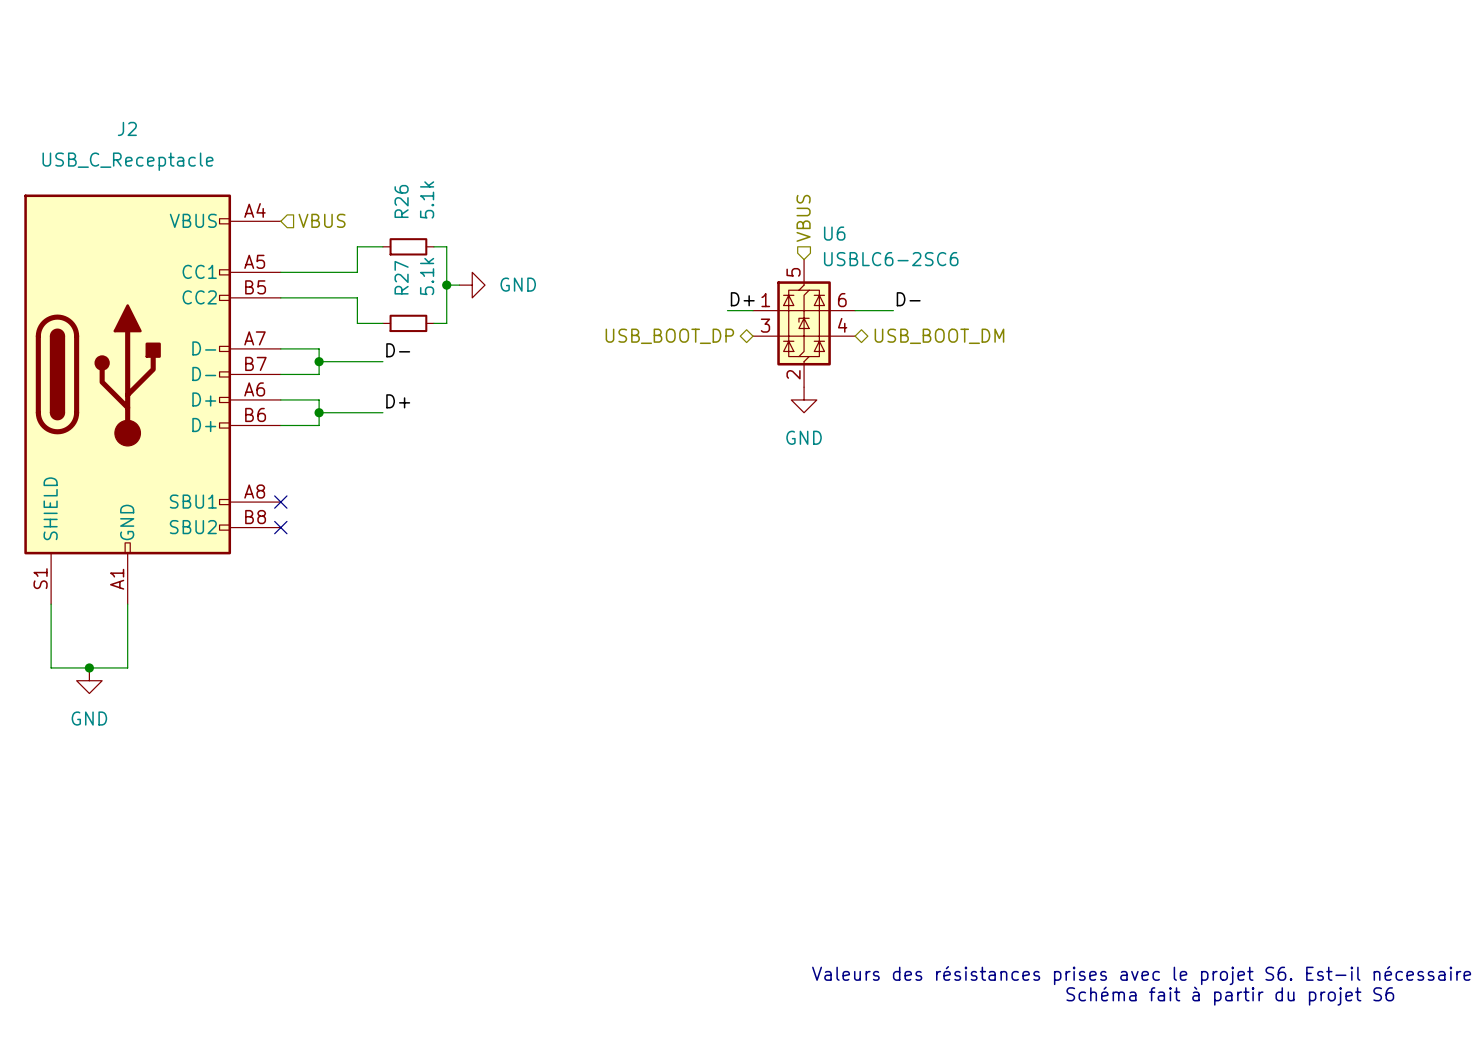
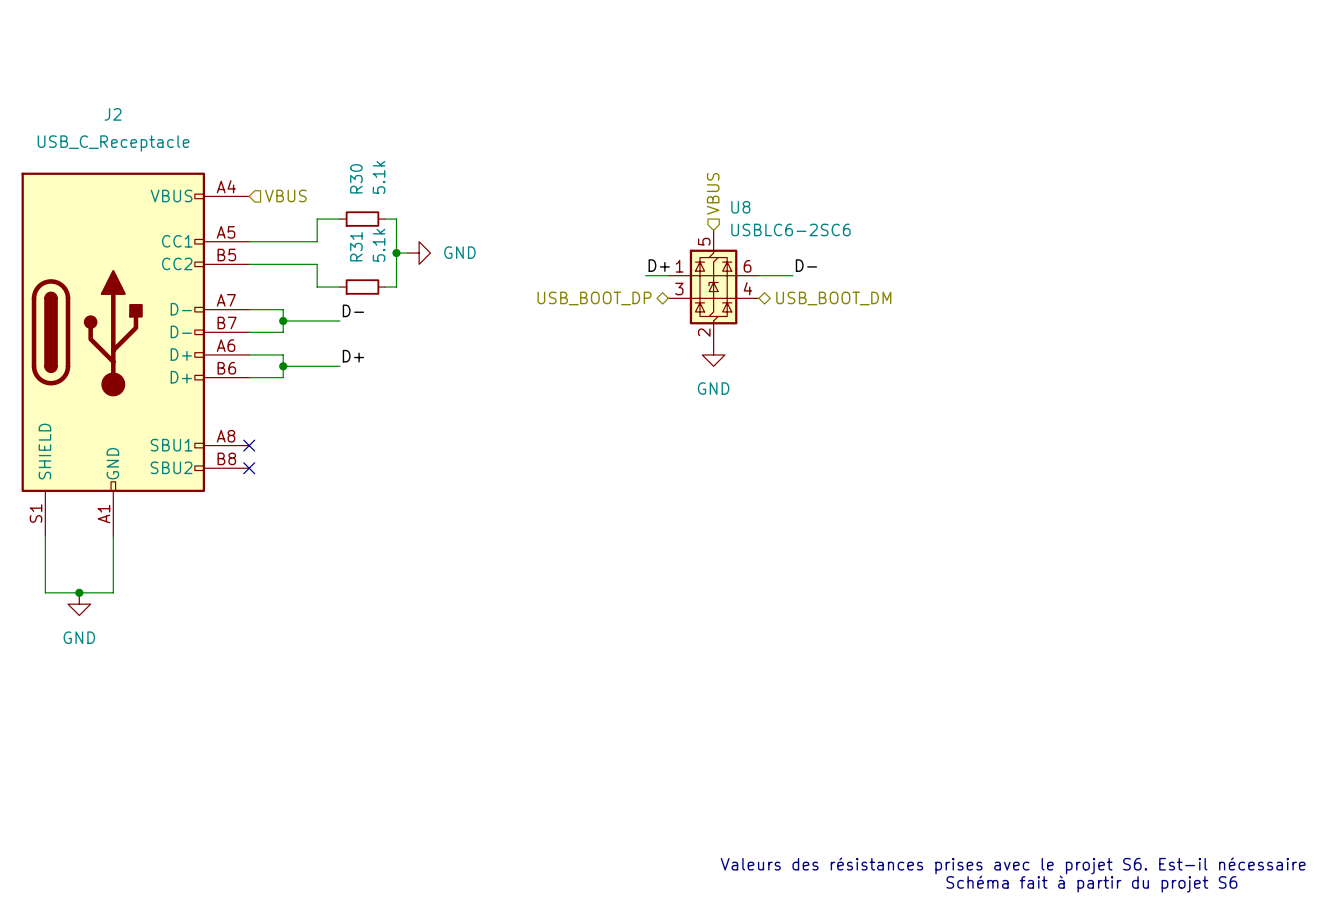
R26 name: R26 (401, 201) -> R30 (356, 178)
U6 name: U6 (834, 233) -> U8 (740, 207)
R27 name: R27 (401, 277) -> R31 (356, 246)

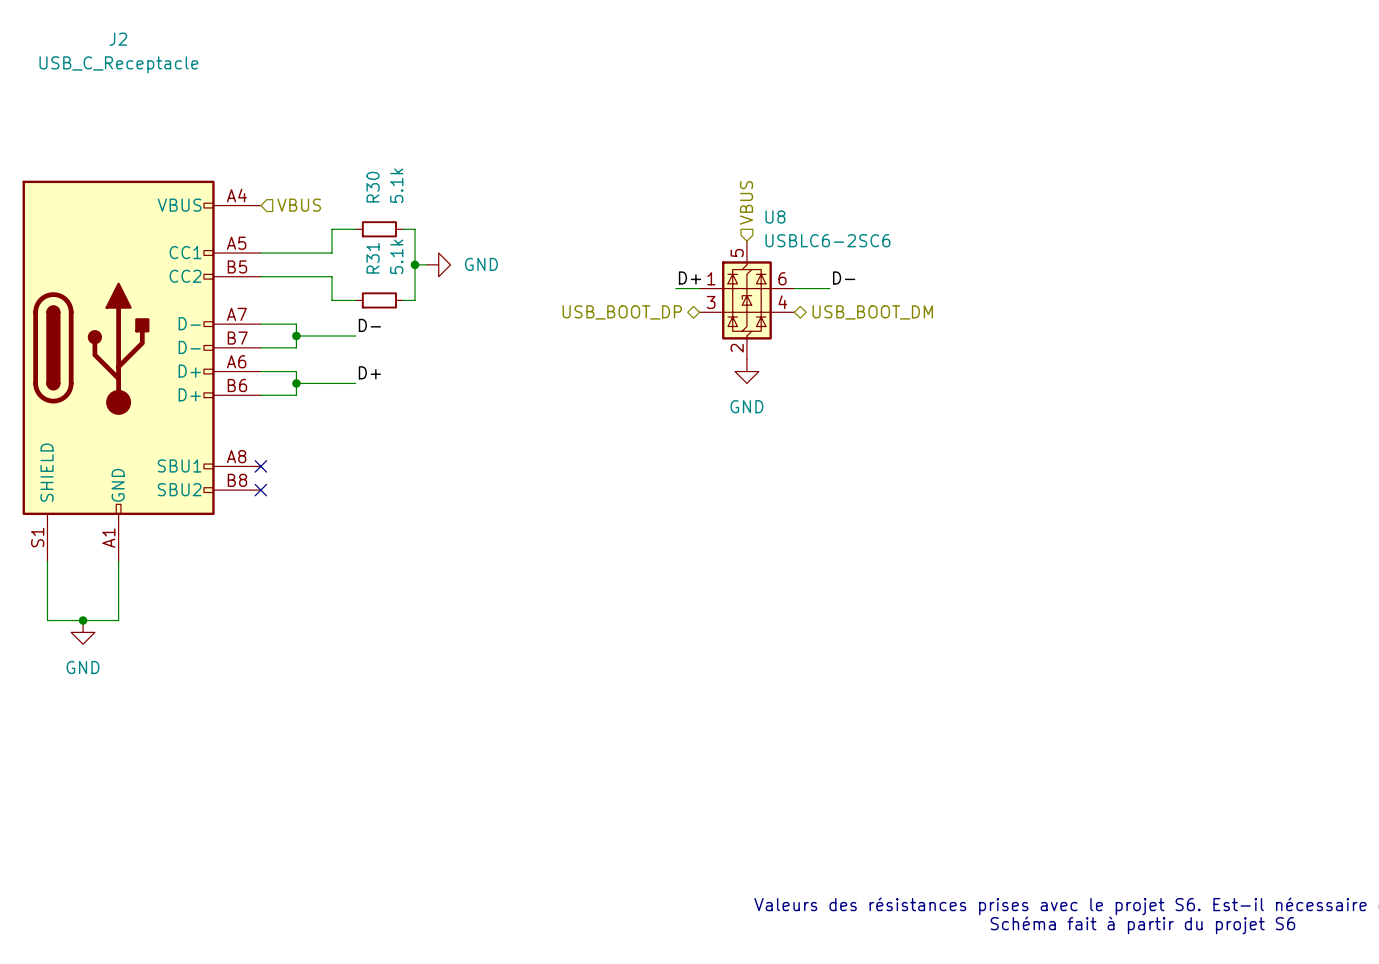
J2 name position: J2 (113, 114) -> J2 (118, 39)
J2 value position: USB_C_Receptacle (113, 143) -> USB_C_Receptacle (118, 64)

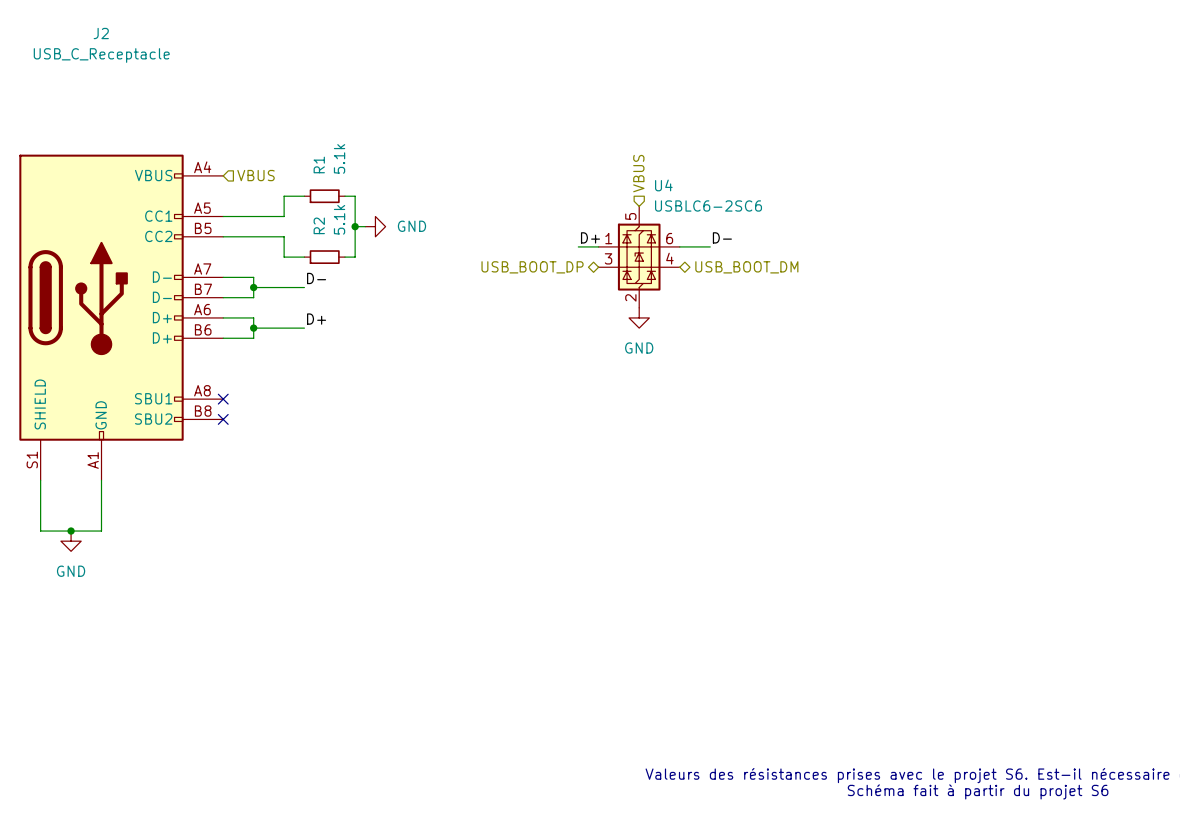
R30 name: R30 (373, 187) -> R1 (319, 164)
U8 name: U8 (775, 217) -> U4 (663, 185)
R31 name: R31 (373, 258) -> R2 (319, 225)

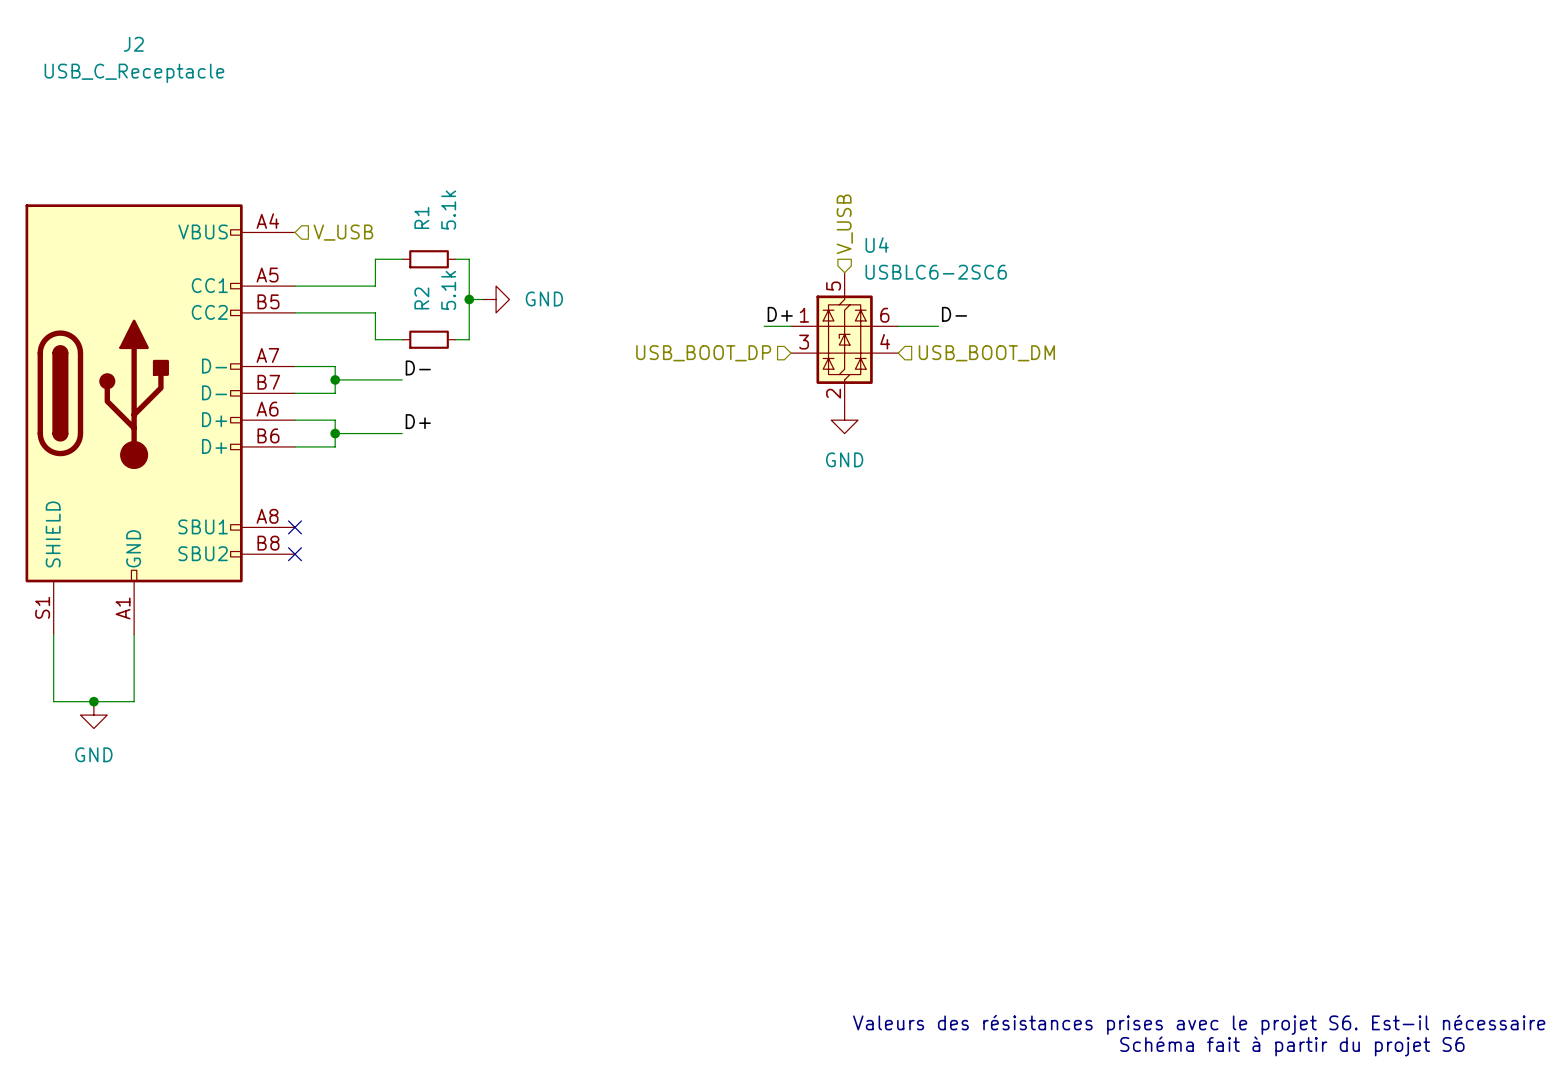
hierarchical label: VBUS (638, 173) -> V_USB (844, 224)
hierarchical label: VBUS (256, 175) -> V_USB (343, 232)
hierarchical label shape: bidirectional (532, 267) -> input (703, 353)
hierarchical label shape: bidirectional (746, 267) -> input (986, 353)

